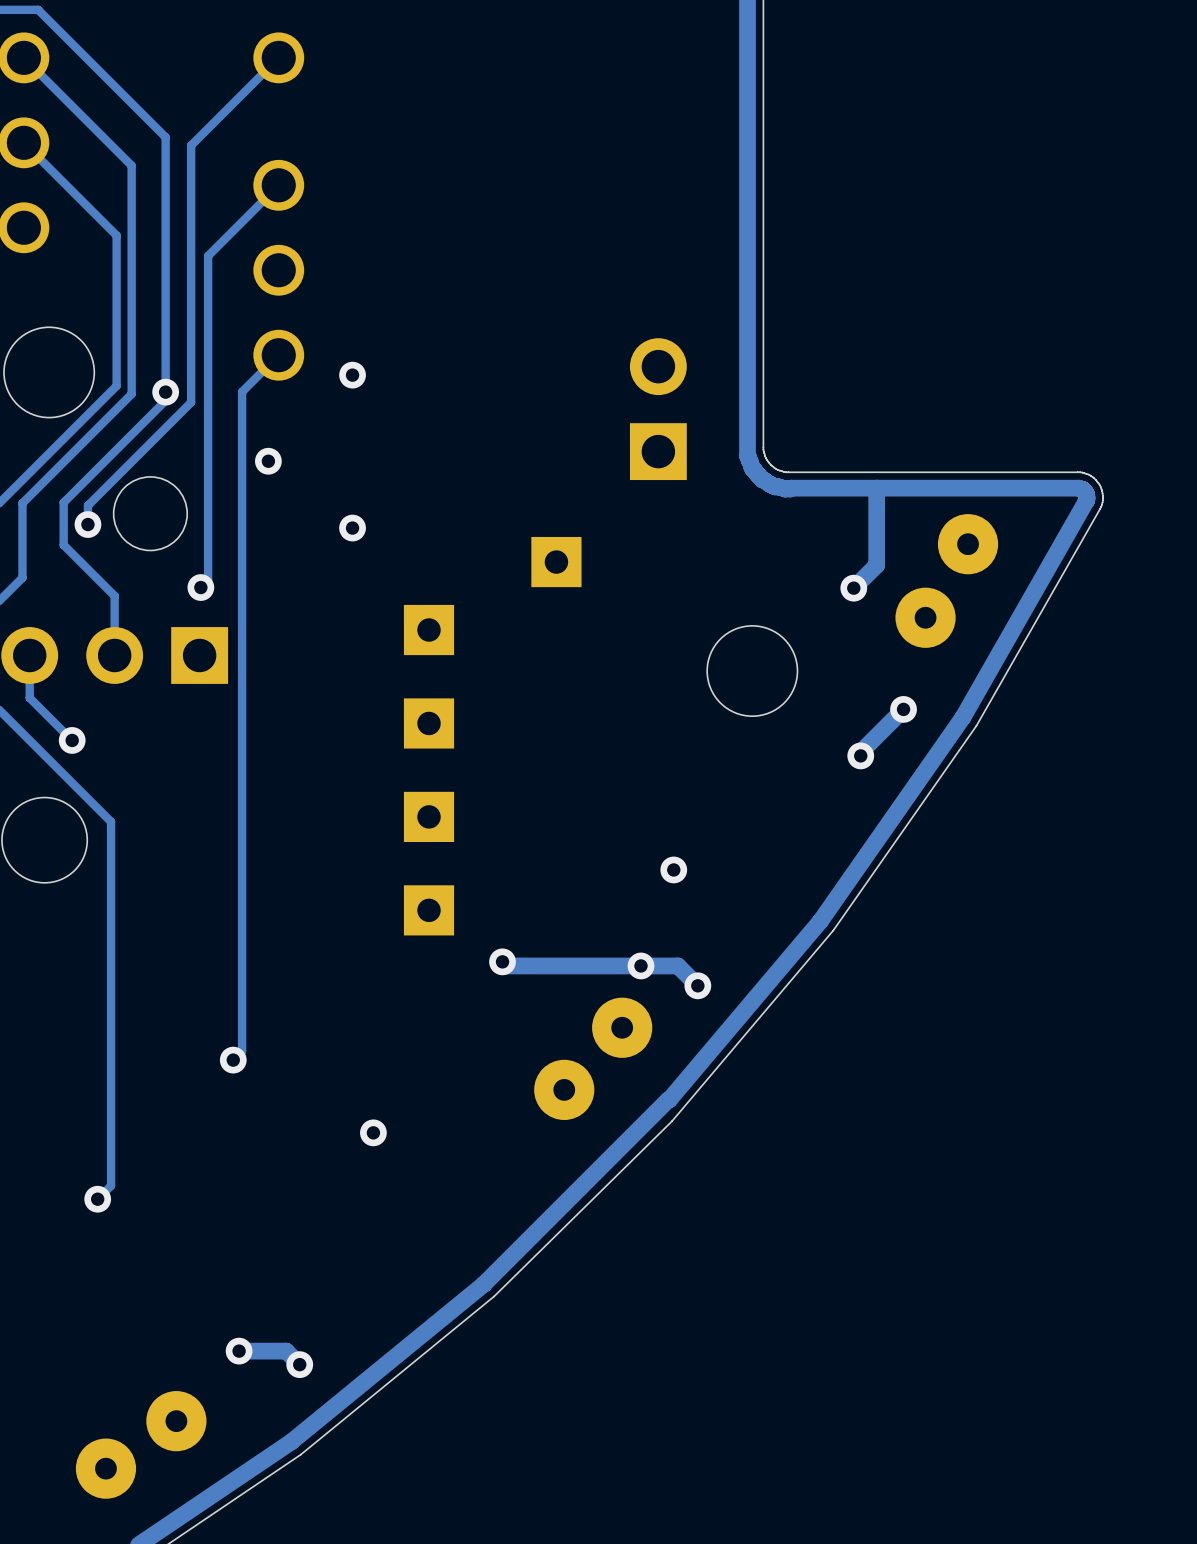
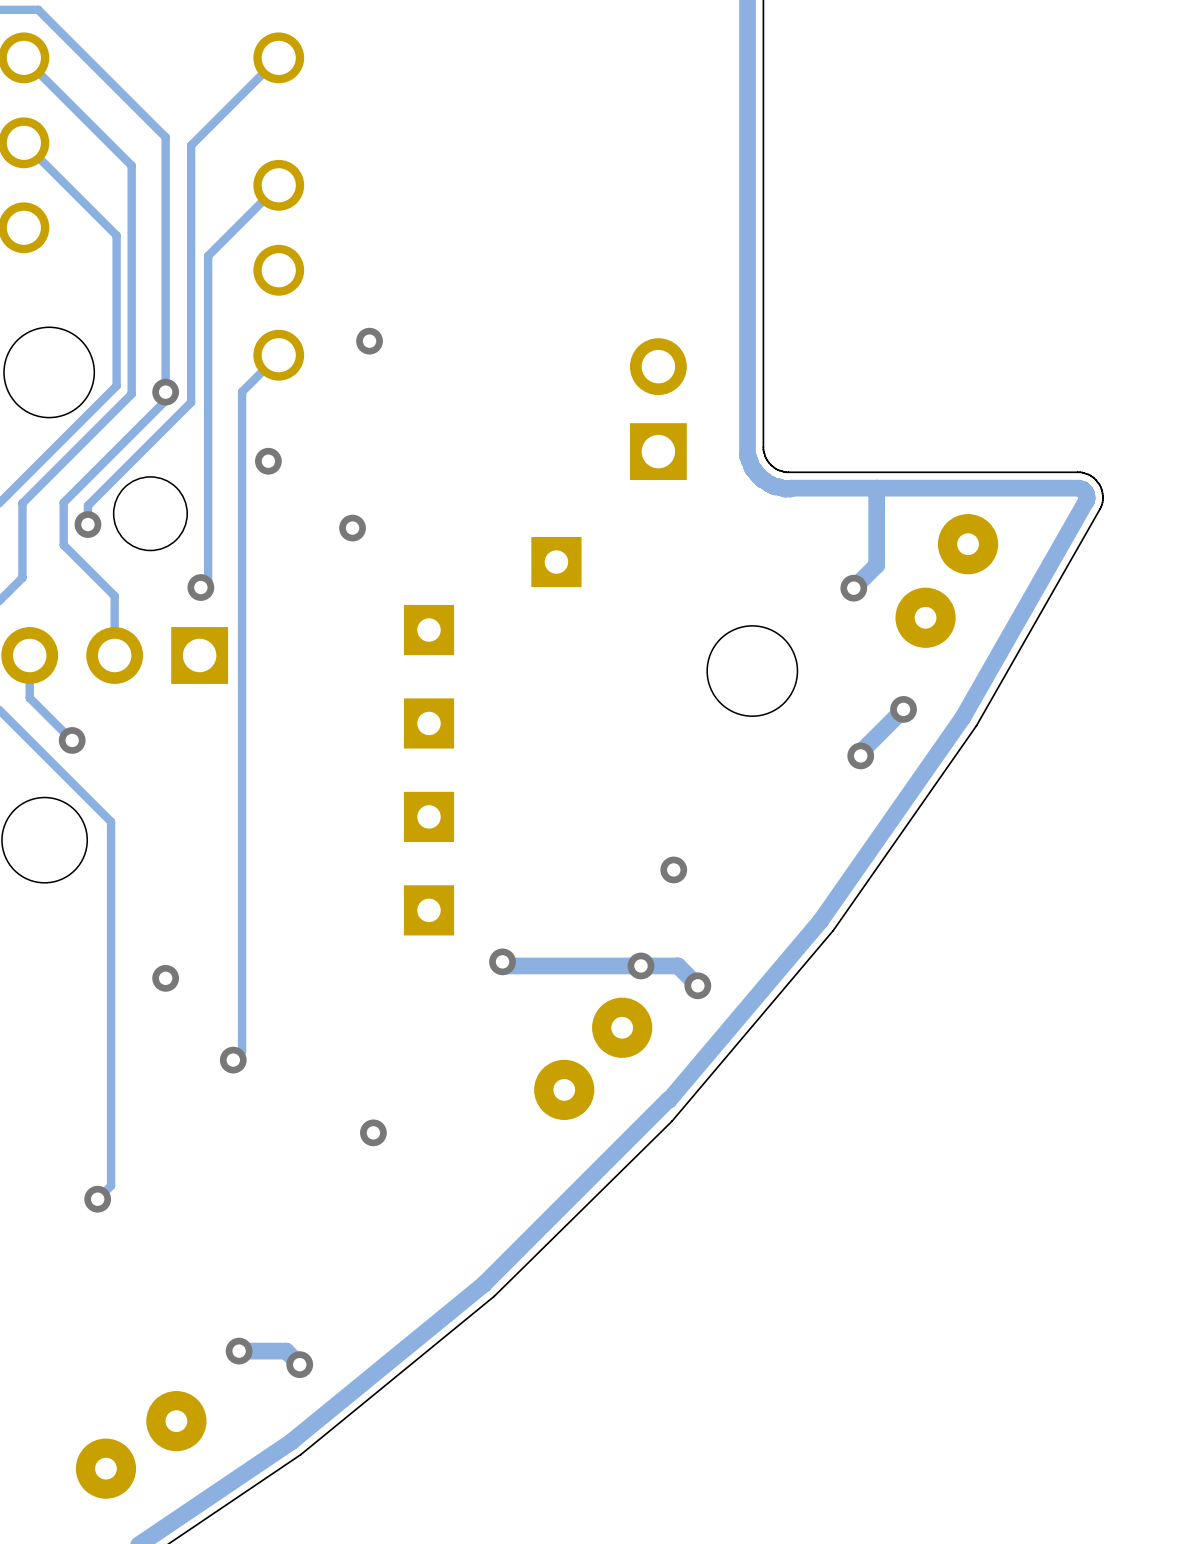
via position: (352, 375) -> (369, 341)
via: none -> (165, 978)

